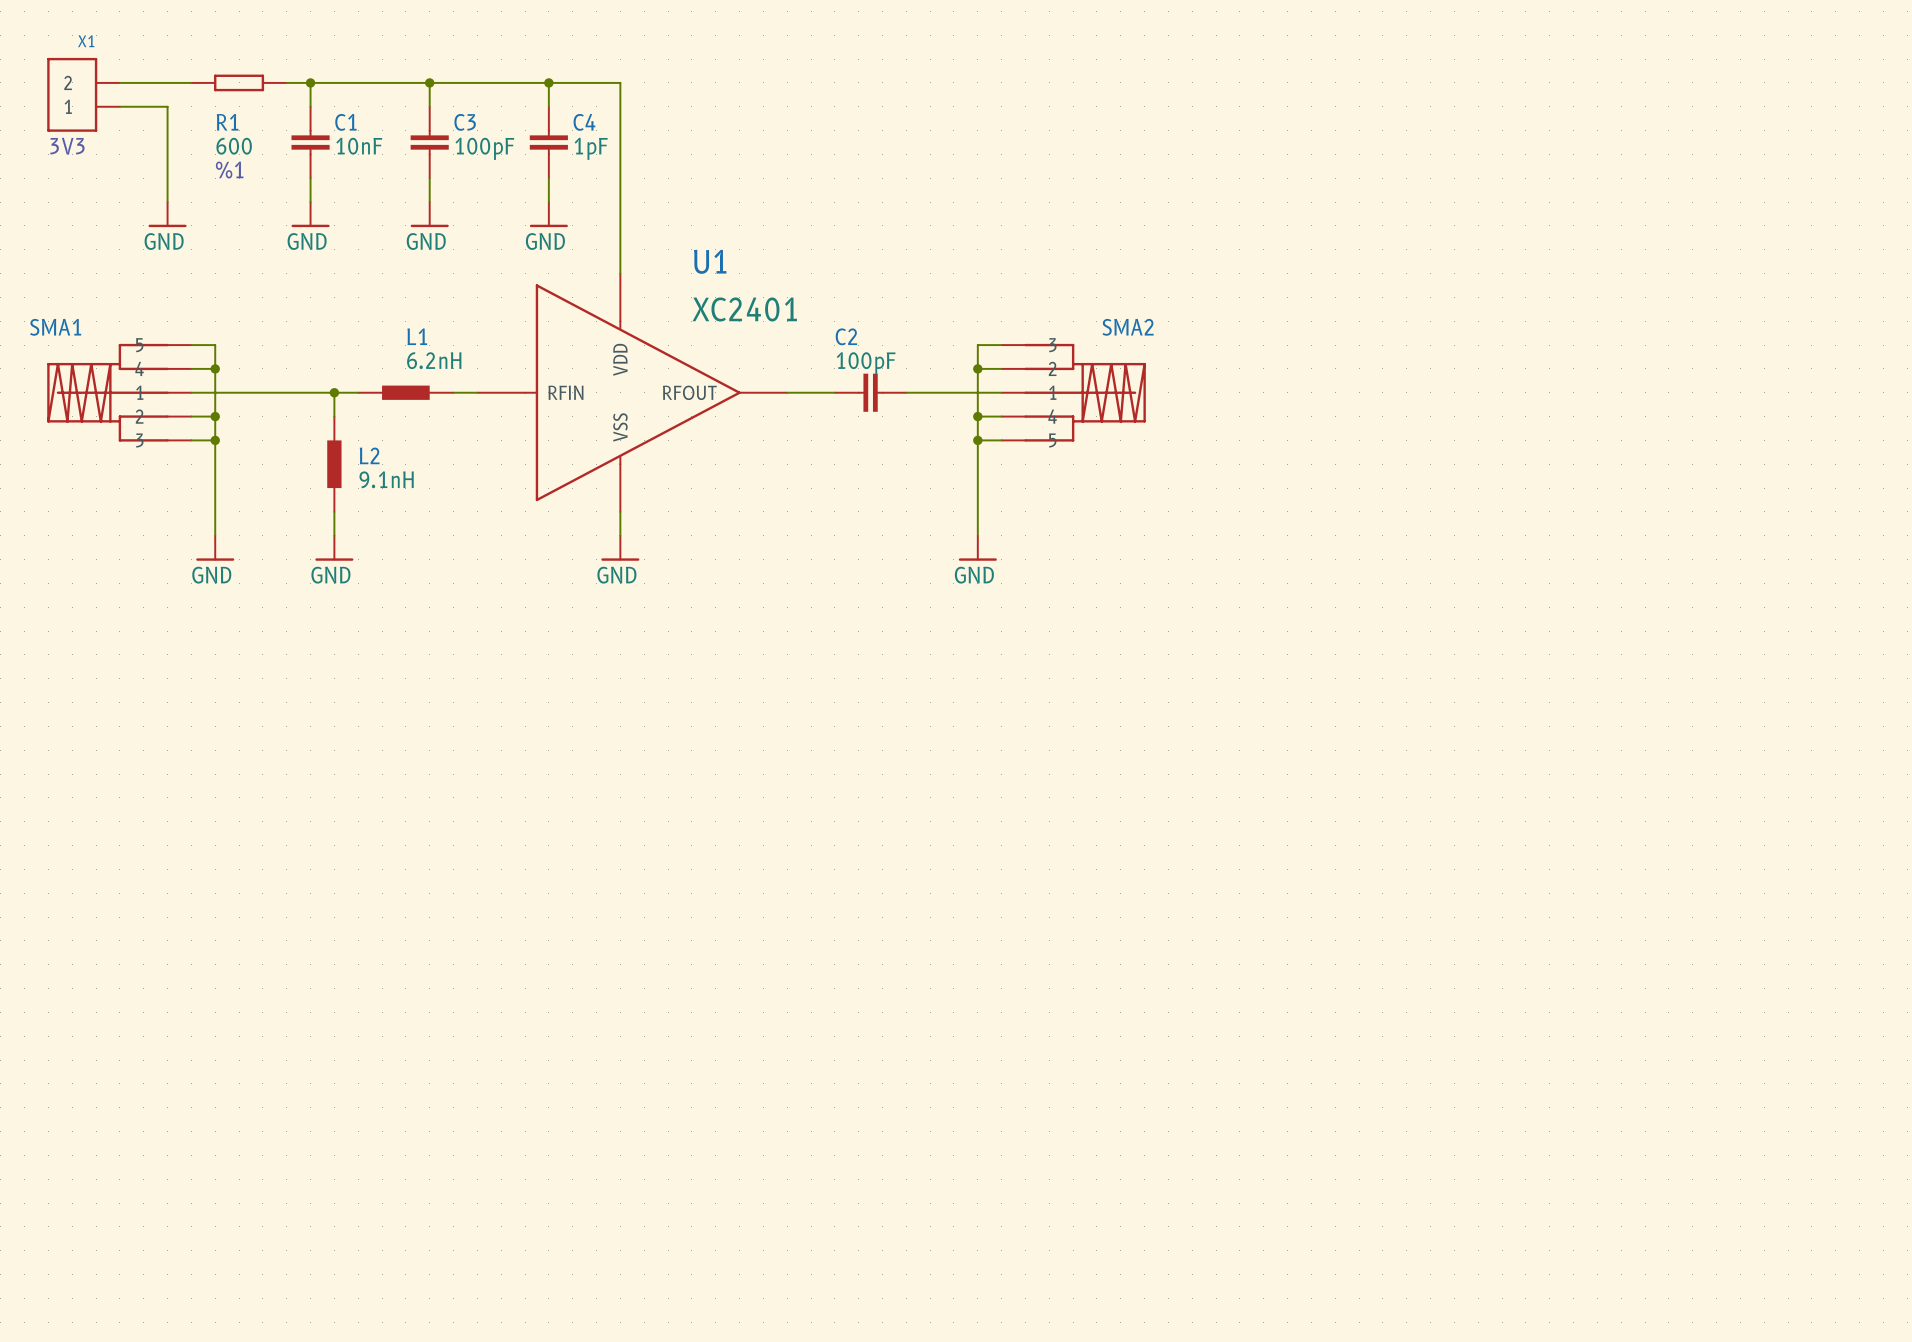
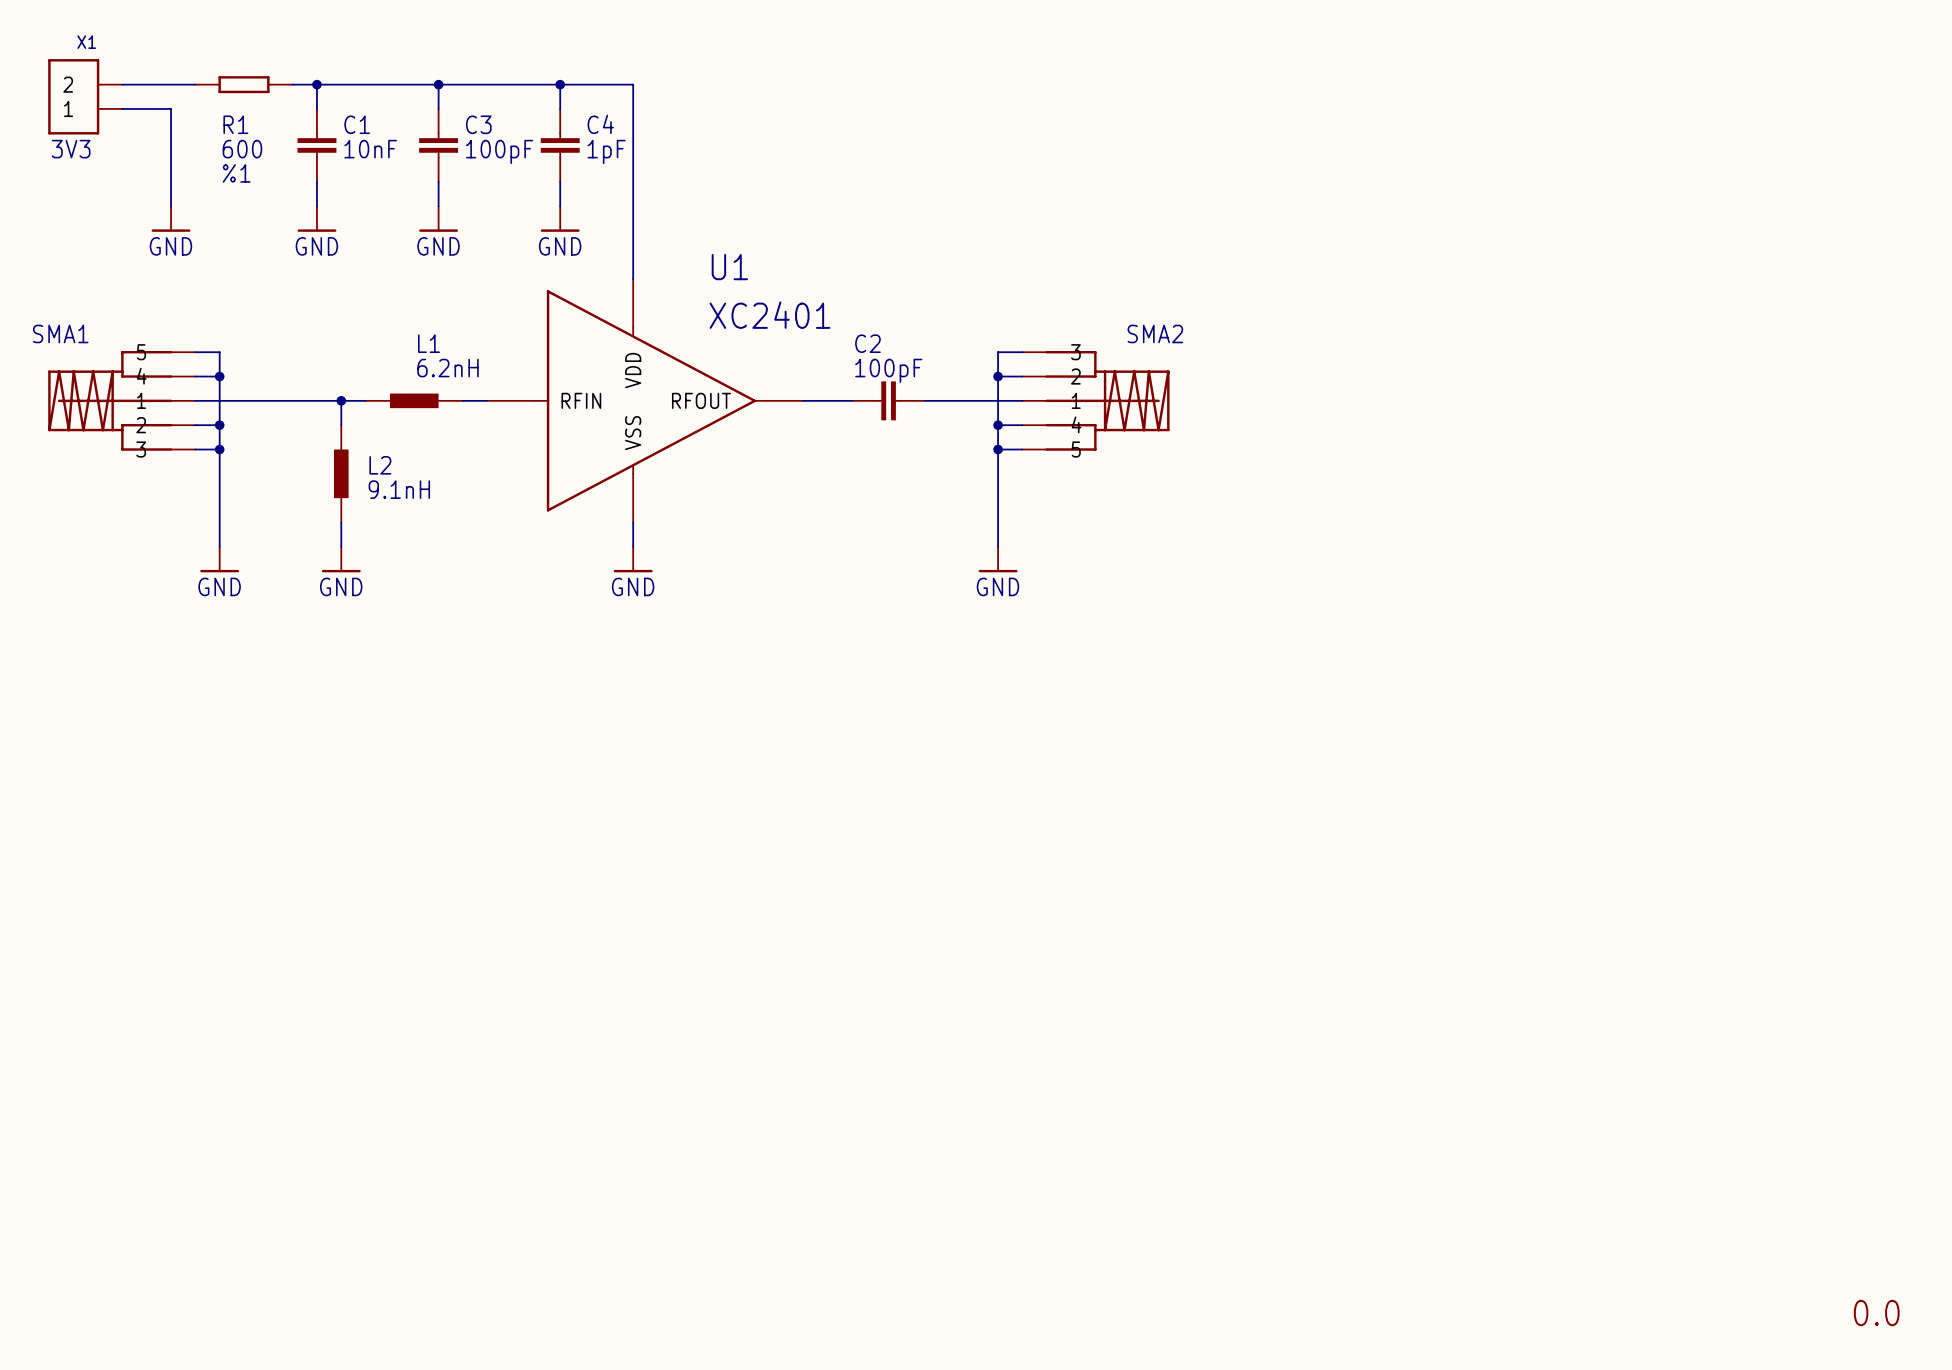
text: none -> 0.0 (1876, 1313)

